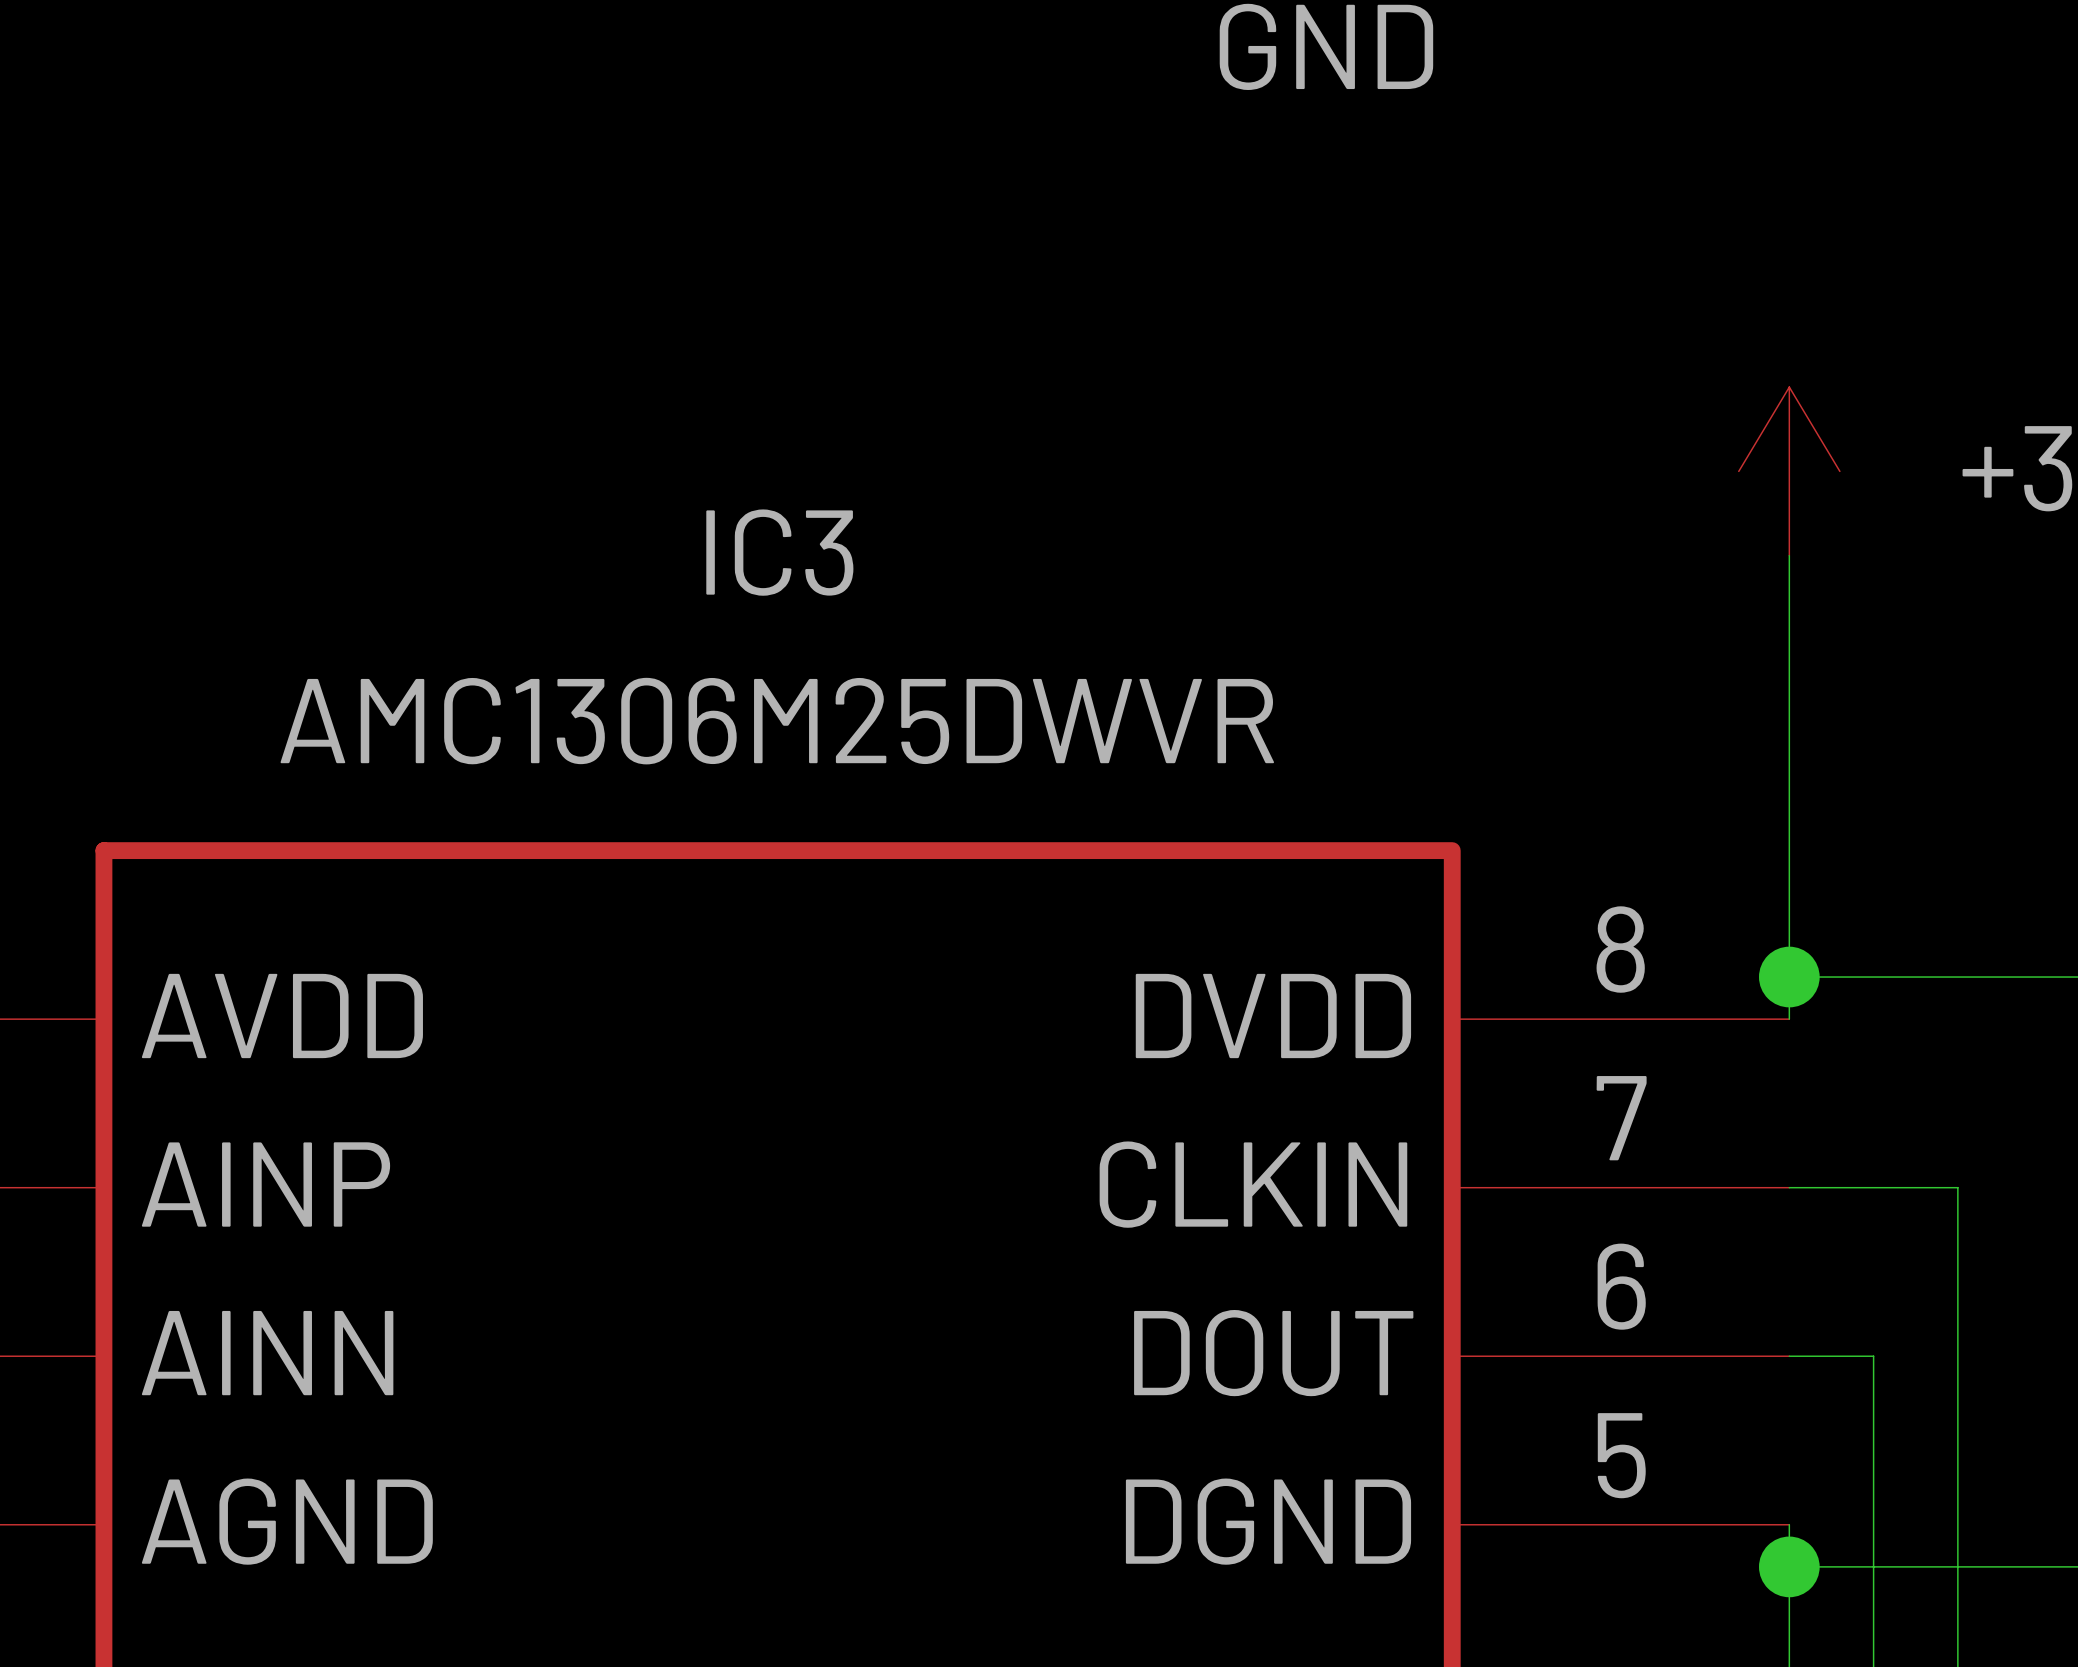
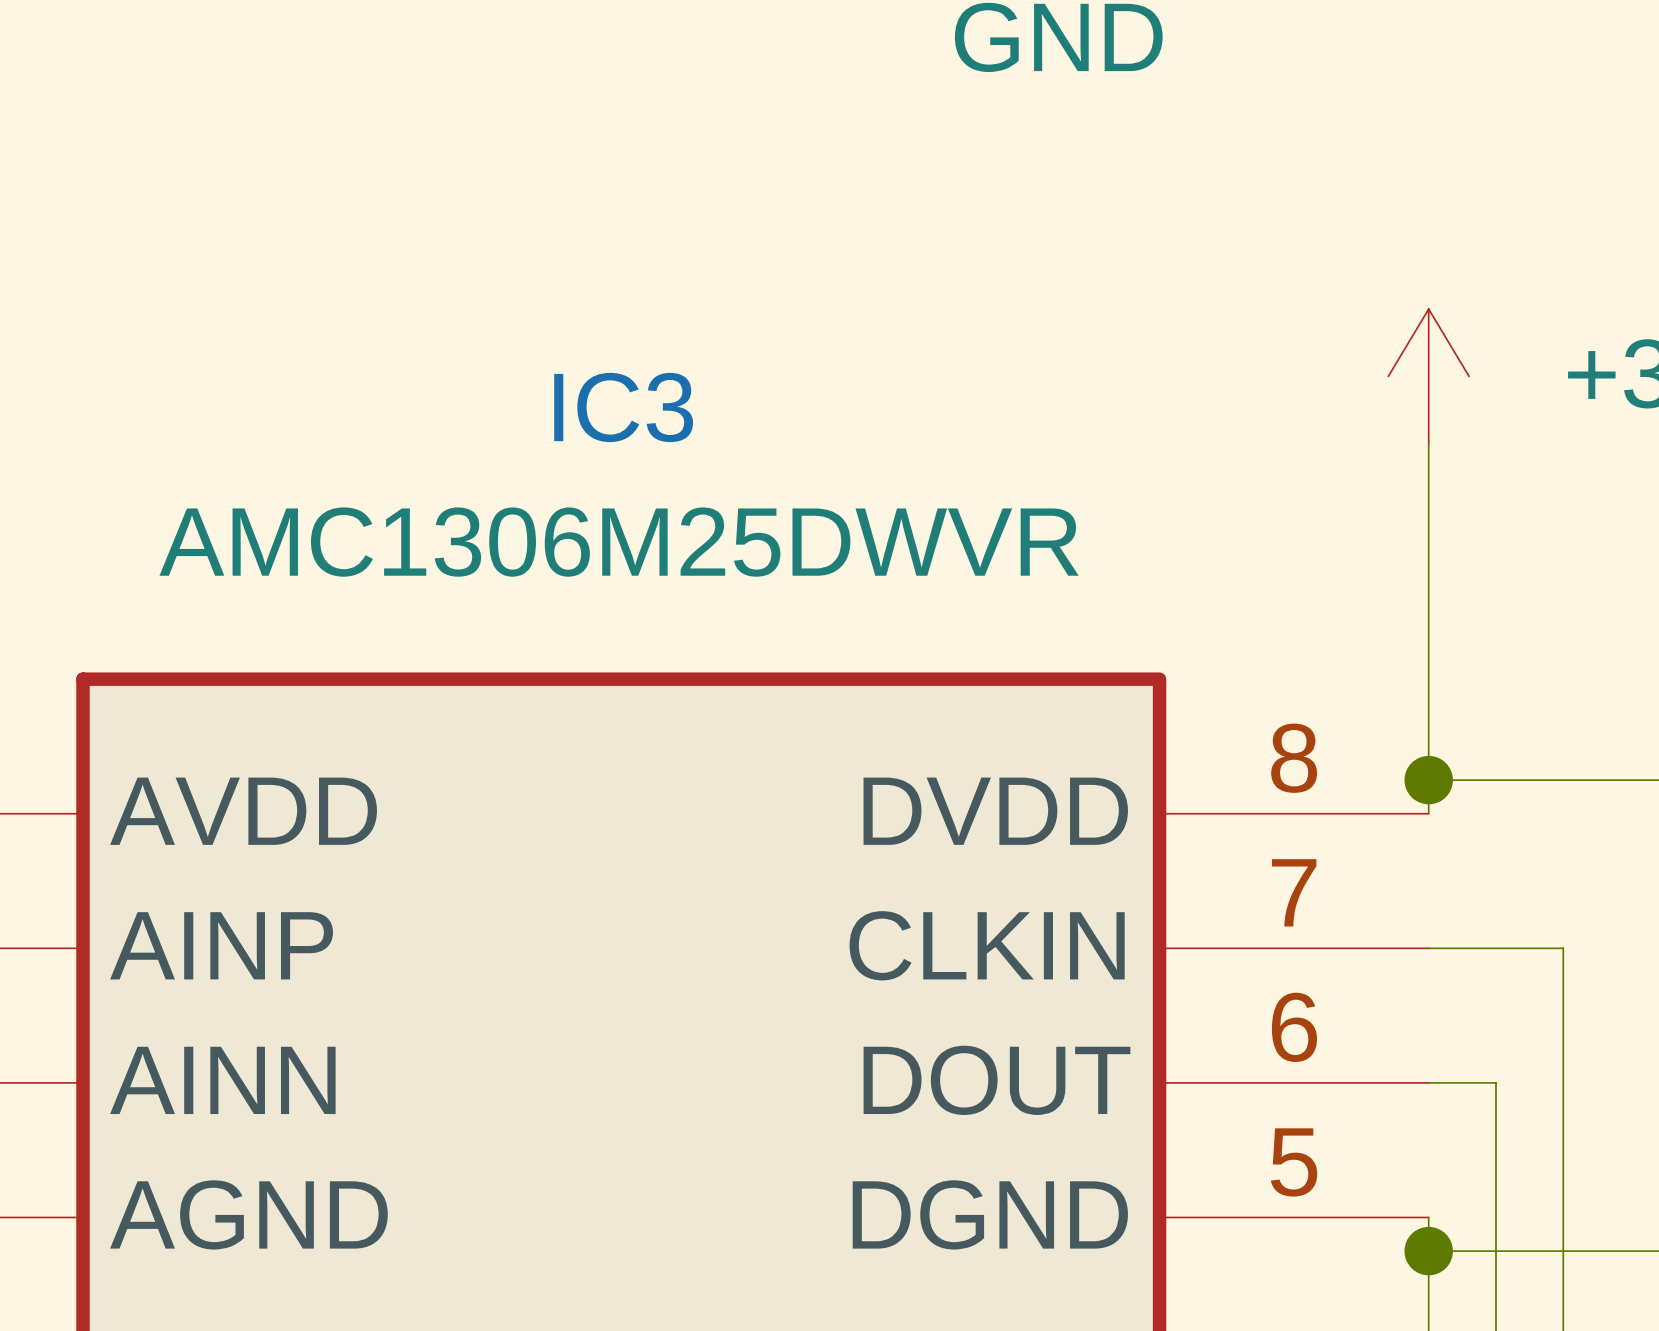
IC3 name position: IC3 (779, 552) -> IC3 (623, 407)
IC3 value position: AMC1306M25DWVR (777, 721) -> AMC1306M25DWVR (619, 542)

